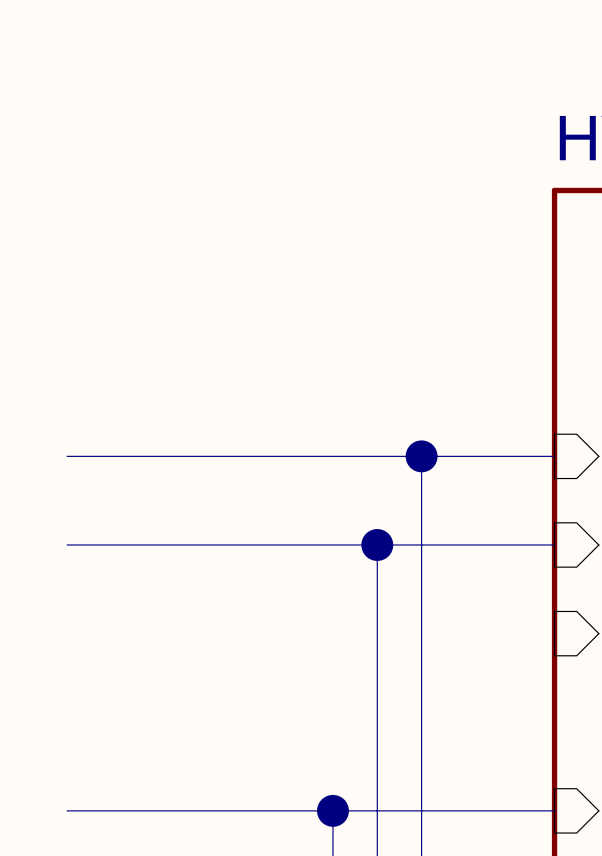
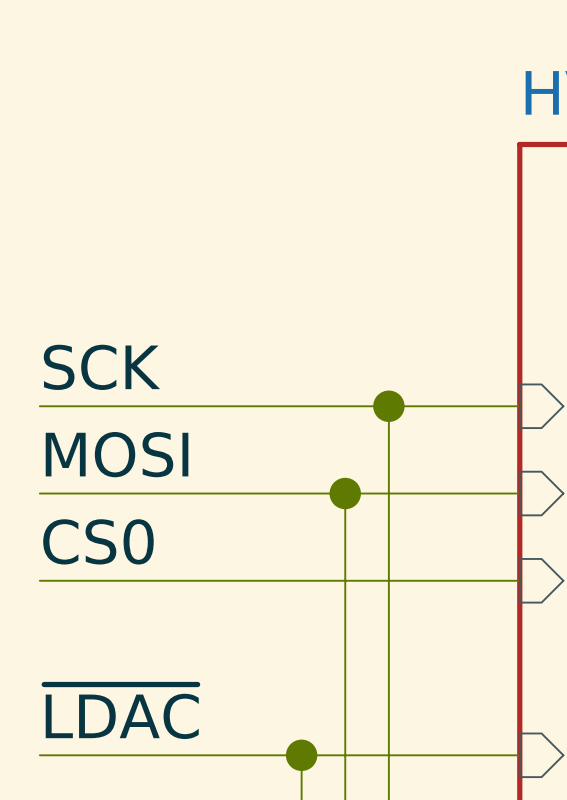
label: none -> SCK (101, 367)
label: none -> MOSI (117, 454)
label: none -> CS0 (98, 541)
wire: none -> (39, 580) (519, 580)
label: none -> ~{LDAC} (121, 711)

